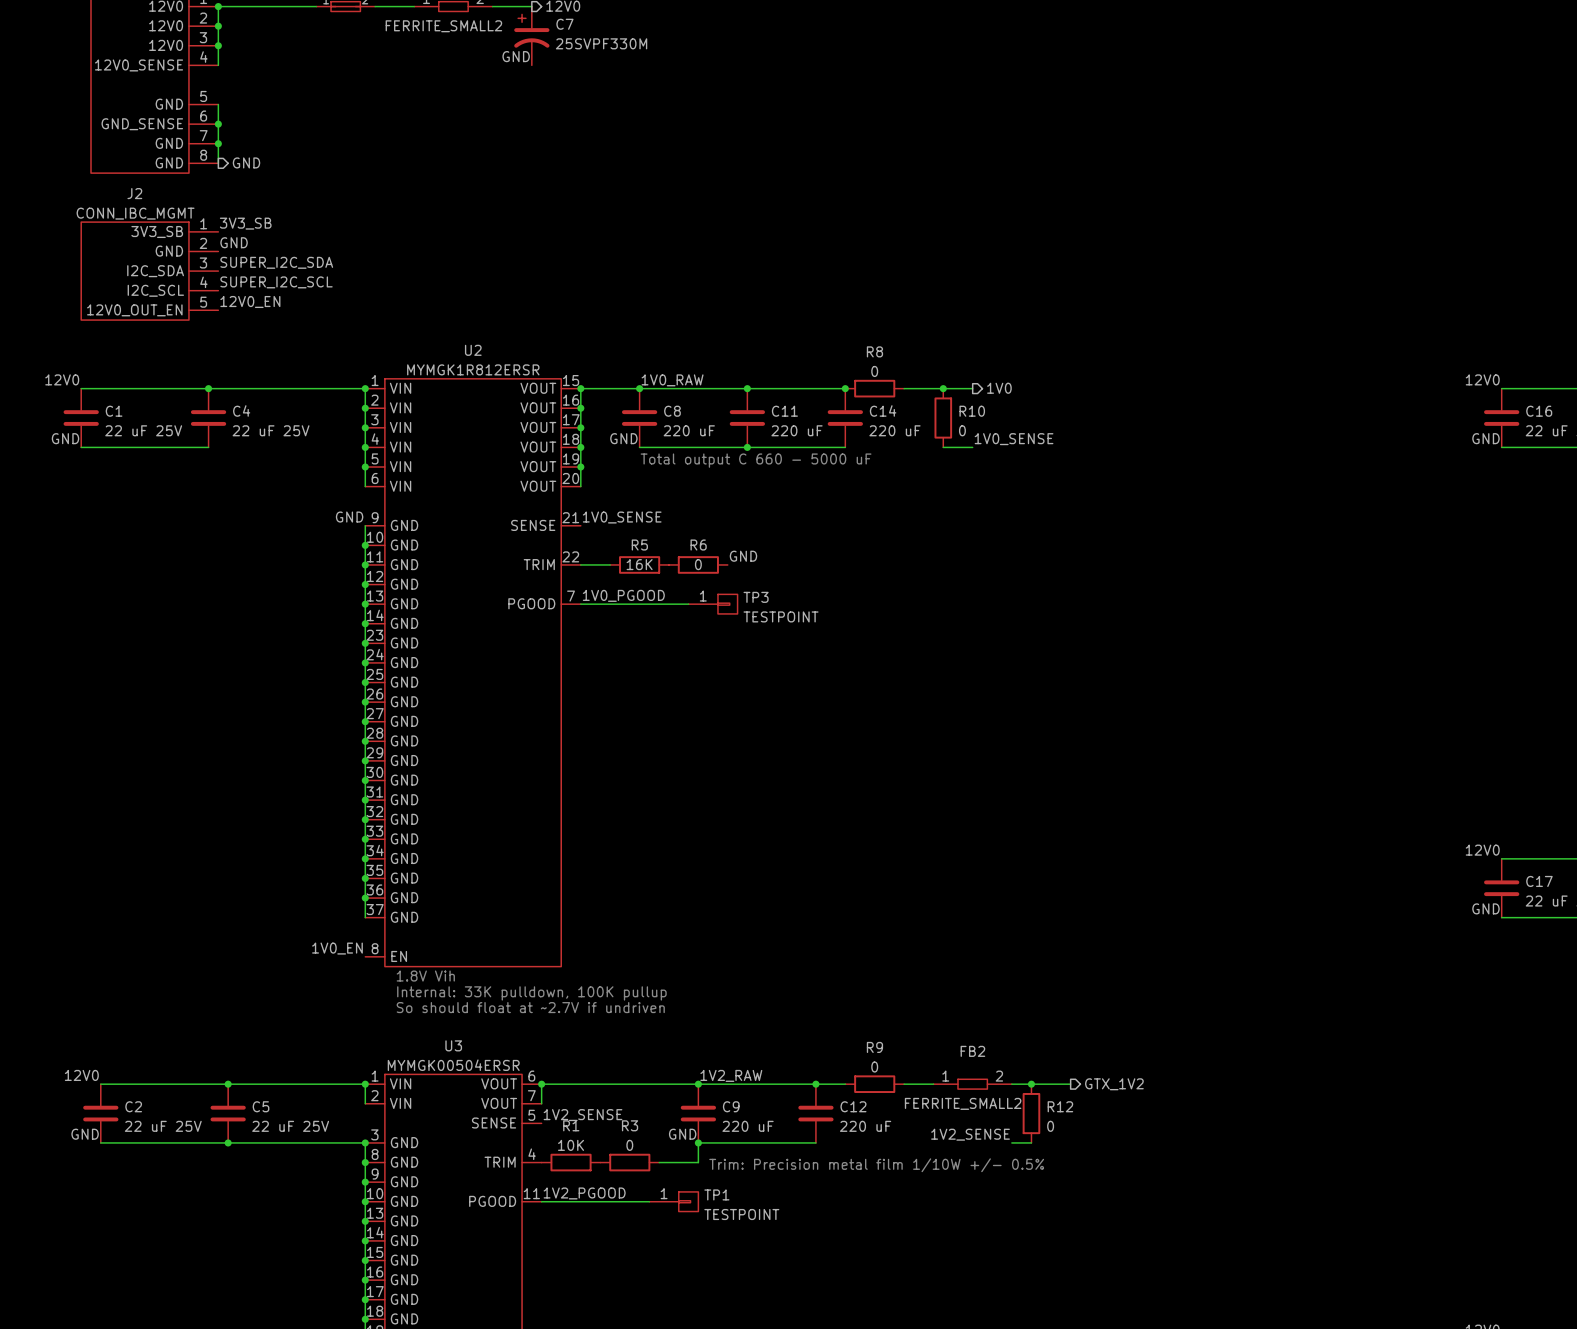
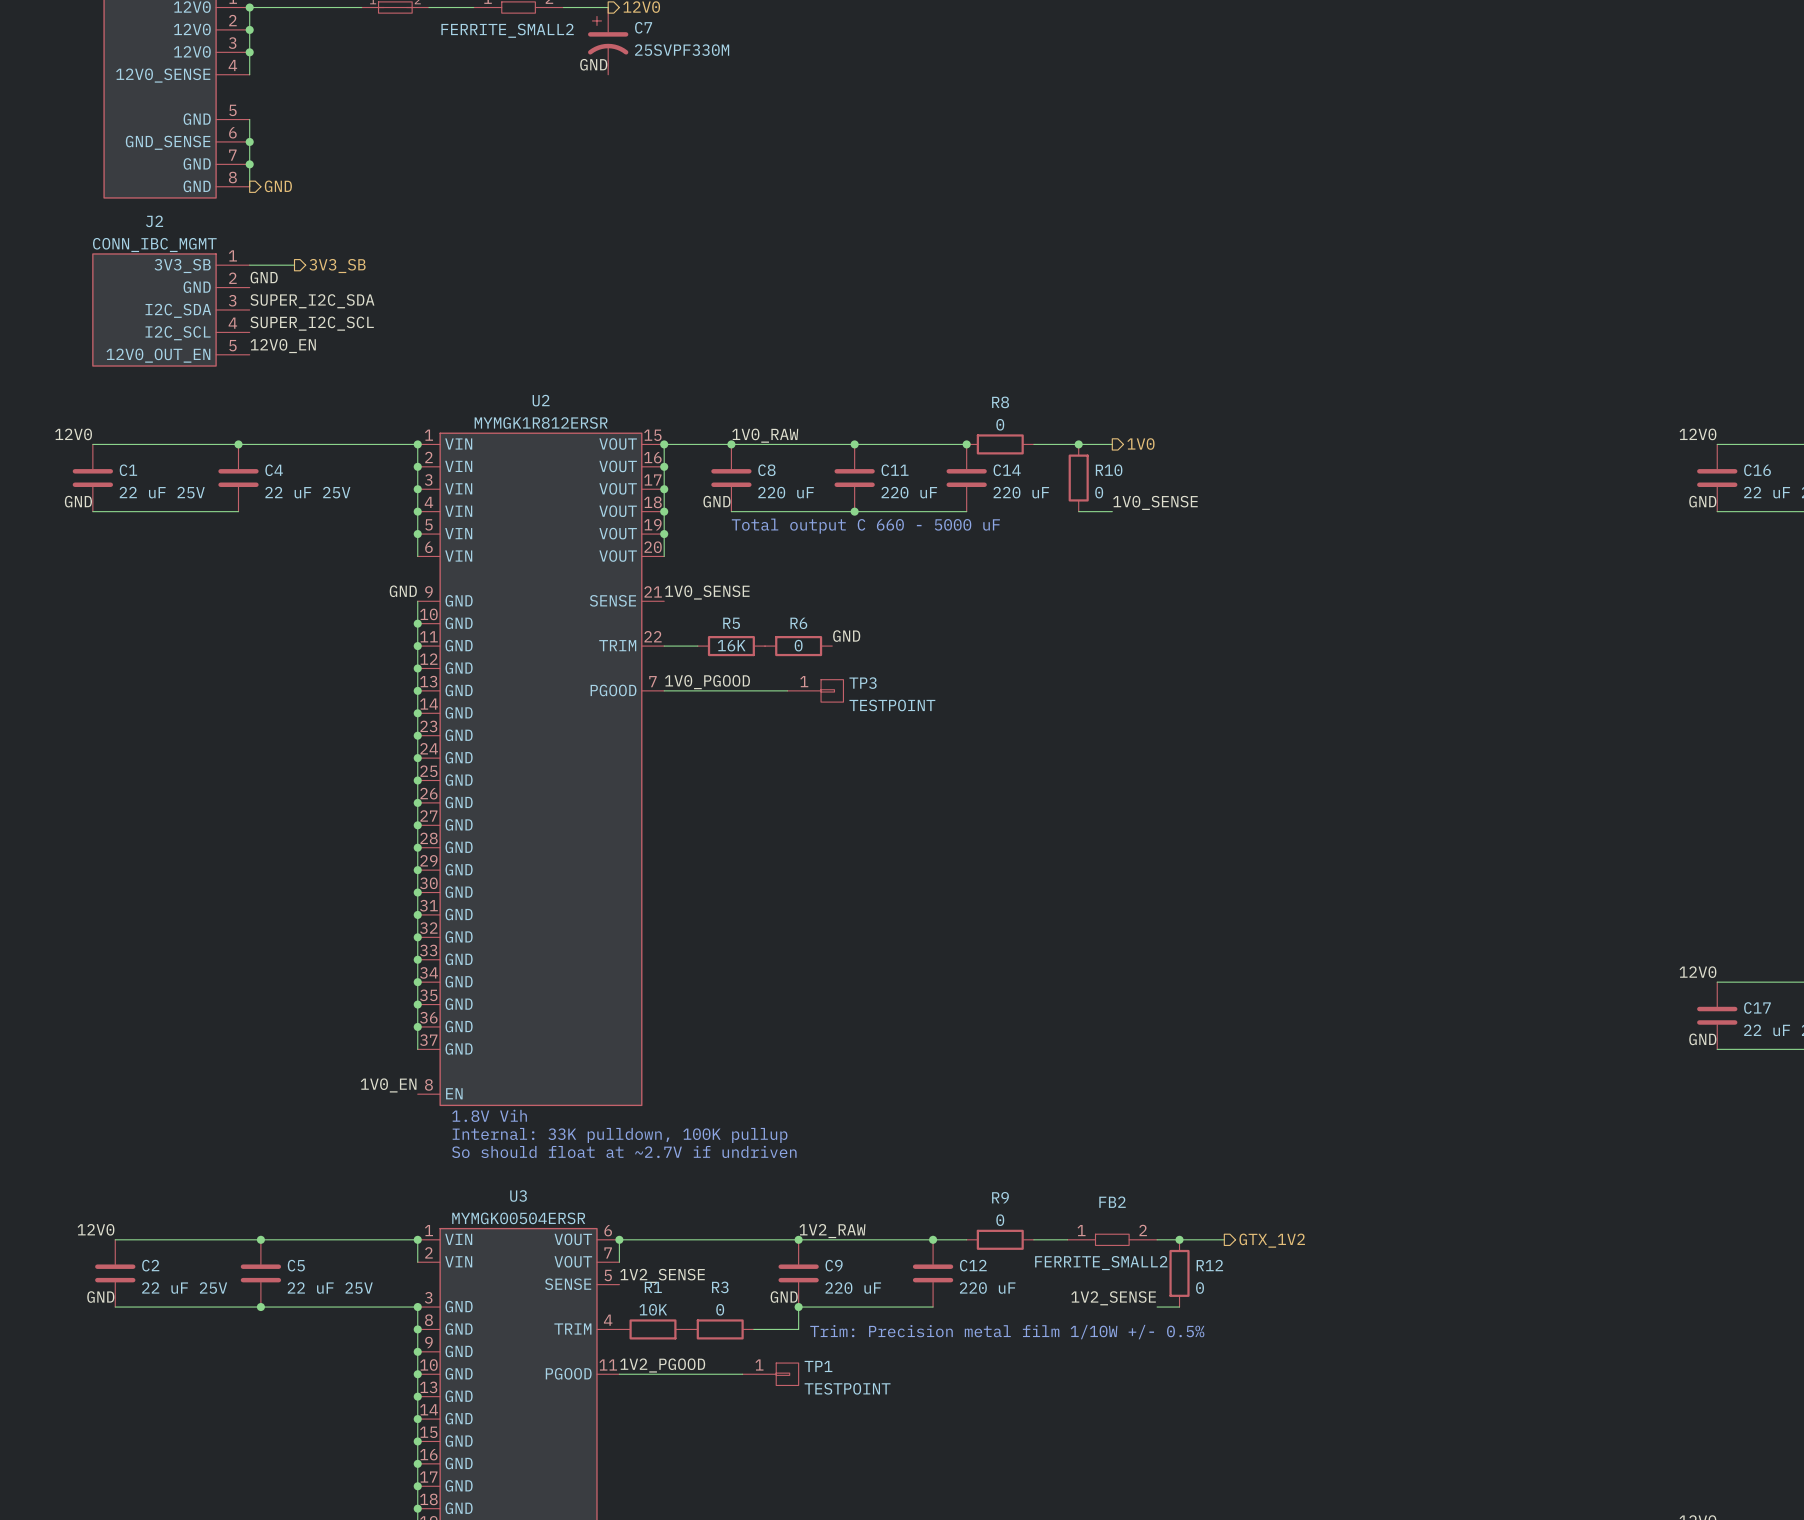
label: 3V3_SB (245, 223) -> none
wire: none -> (249, 265) (294, 265)
hierarchical label: none -> 3V3_SB (337, 266)

